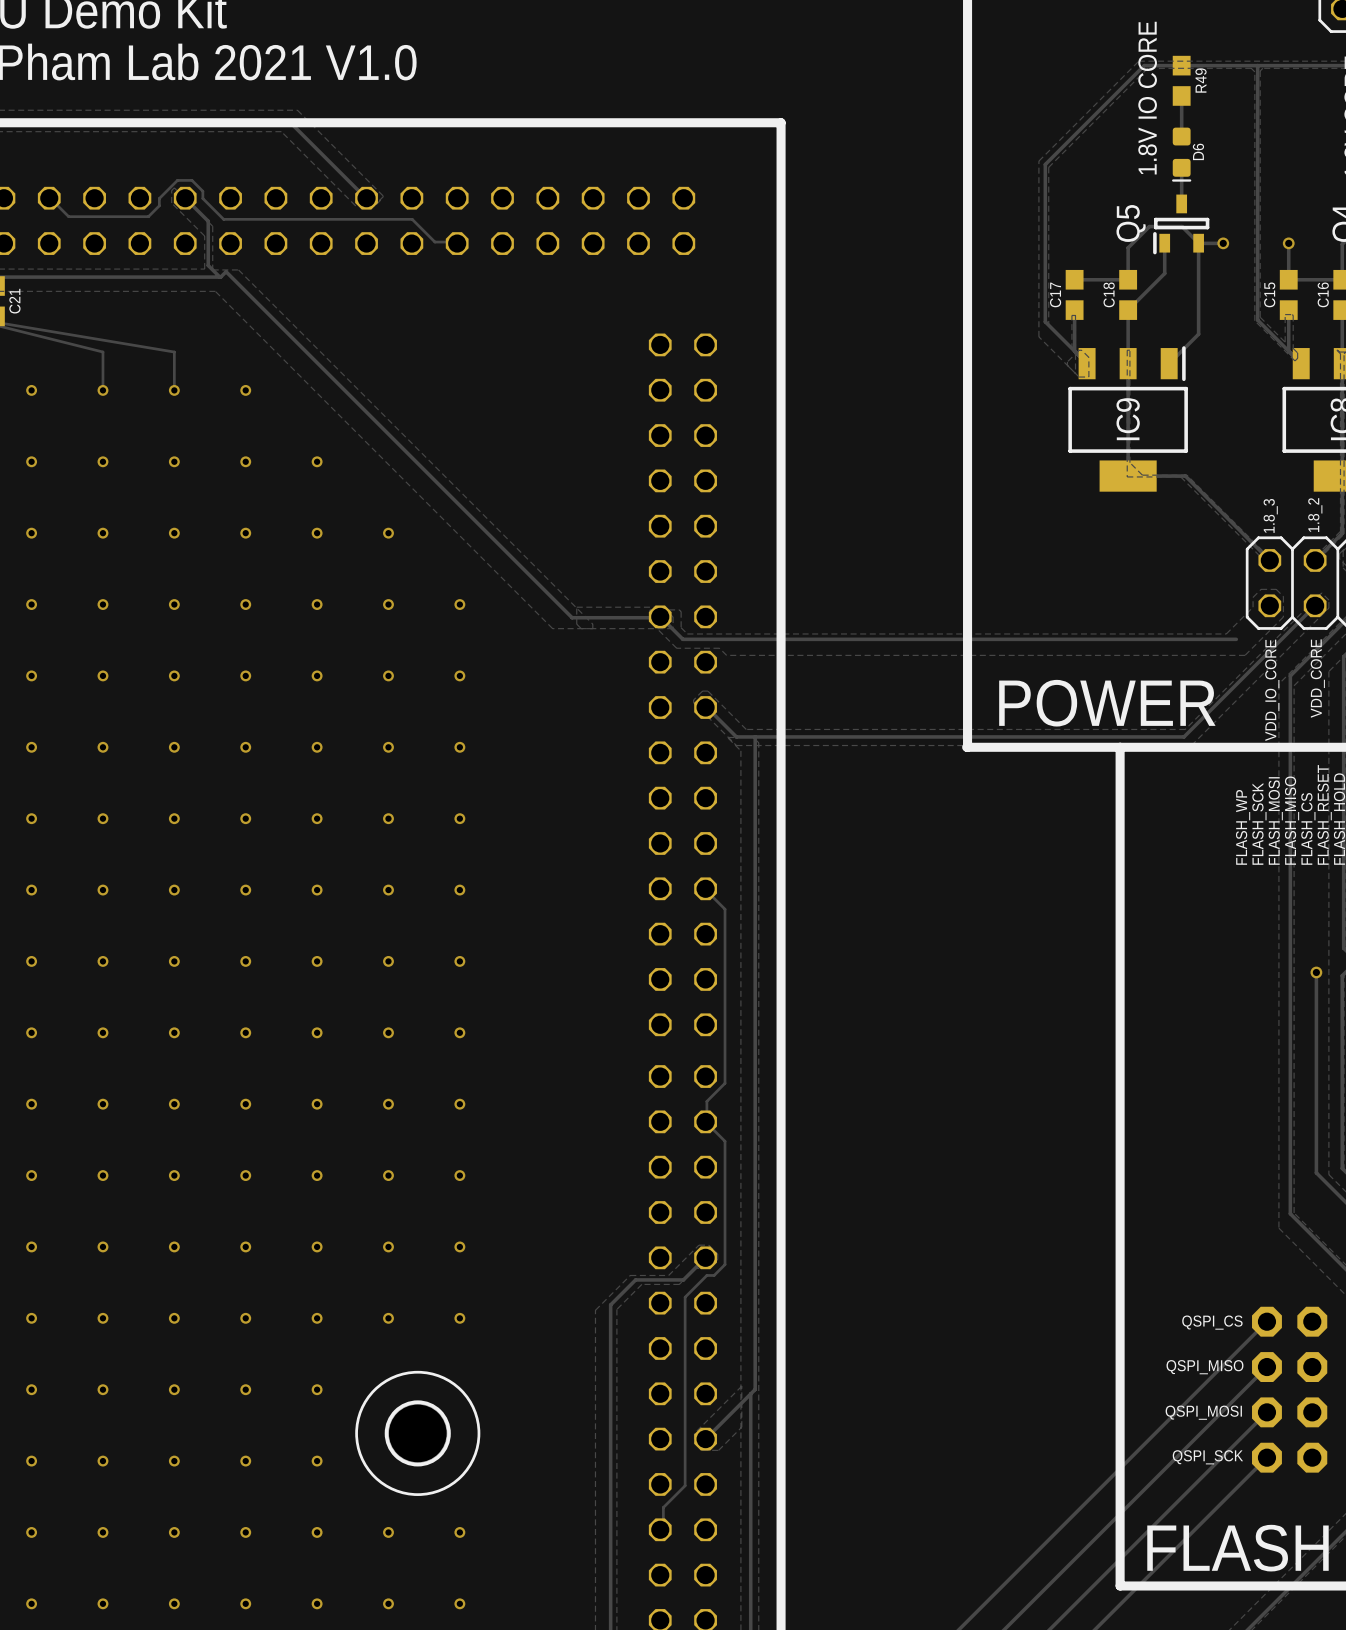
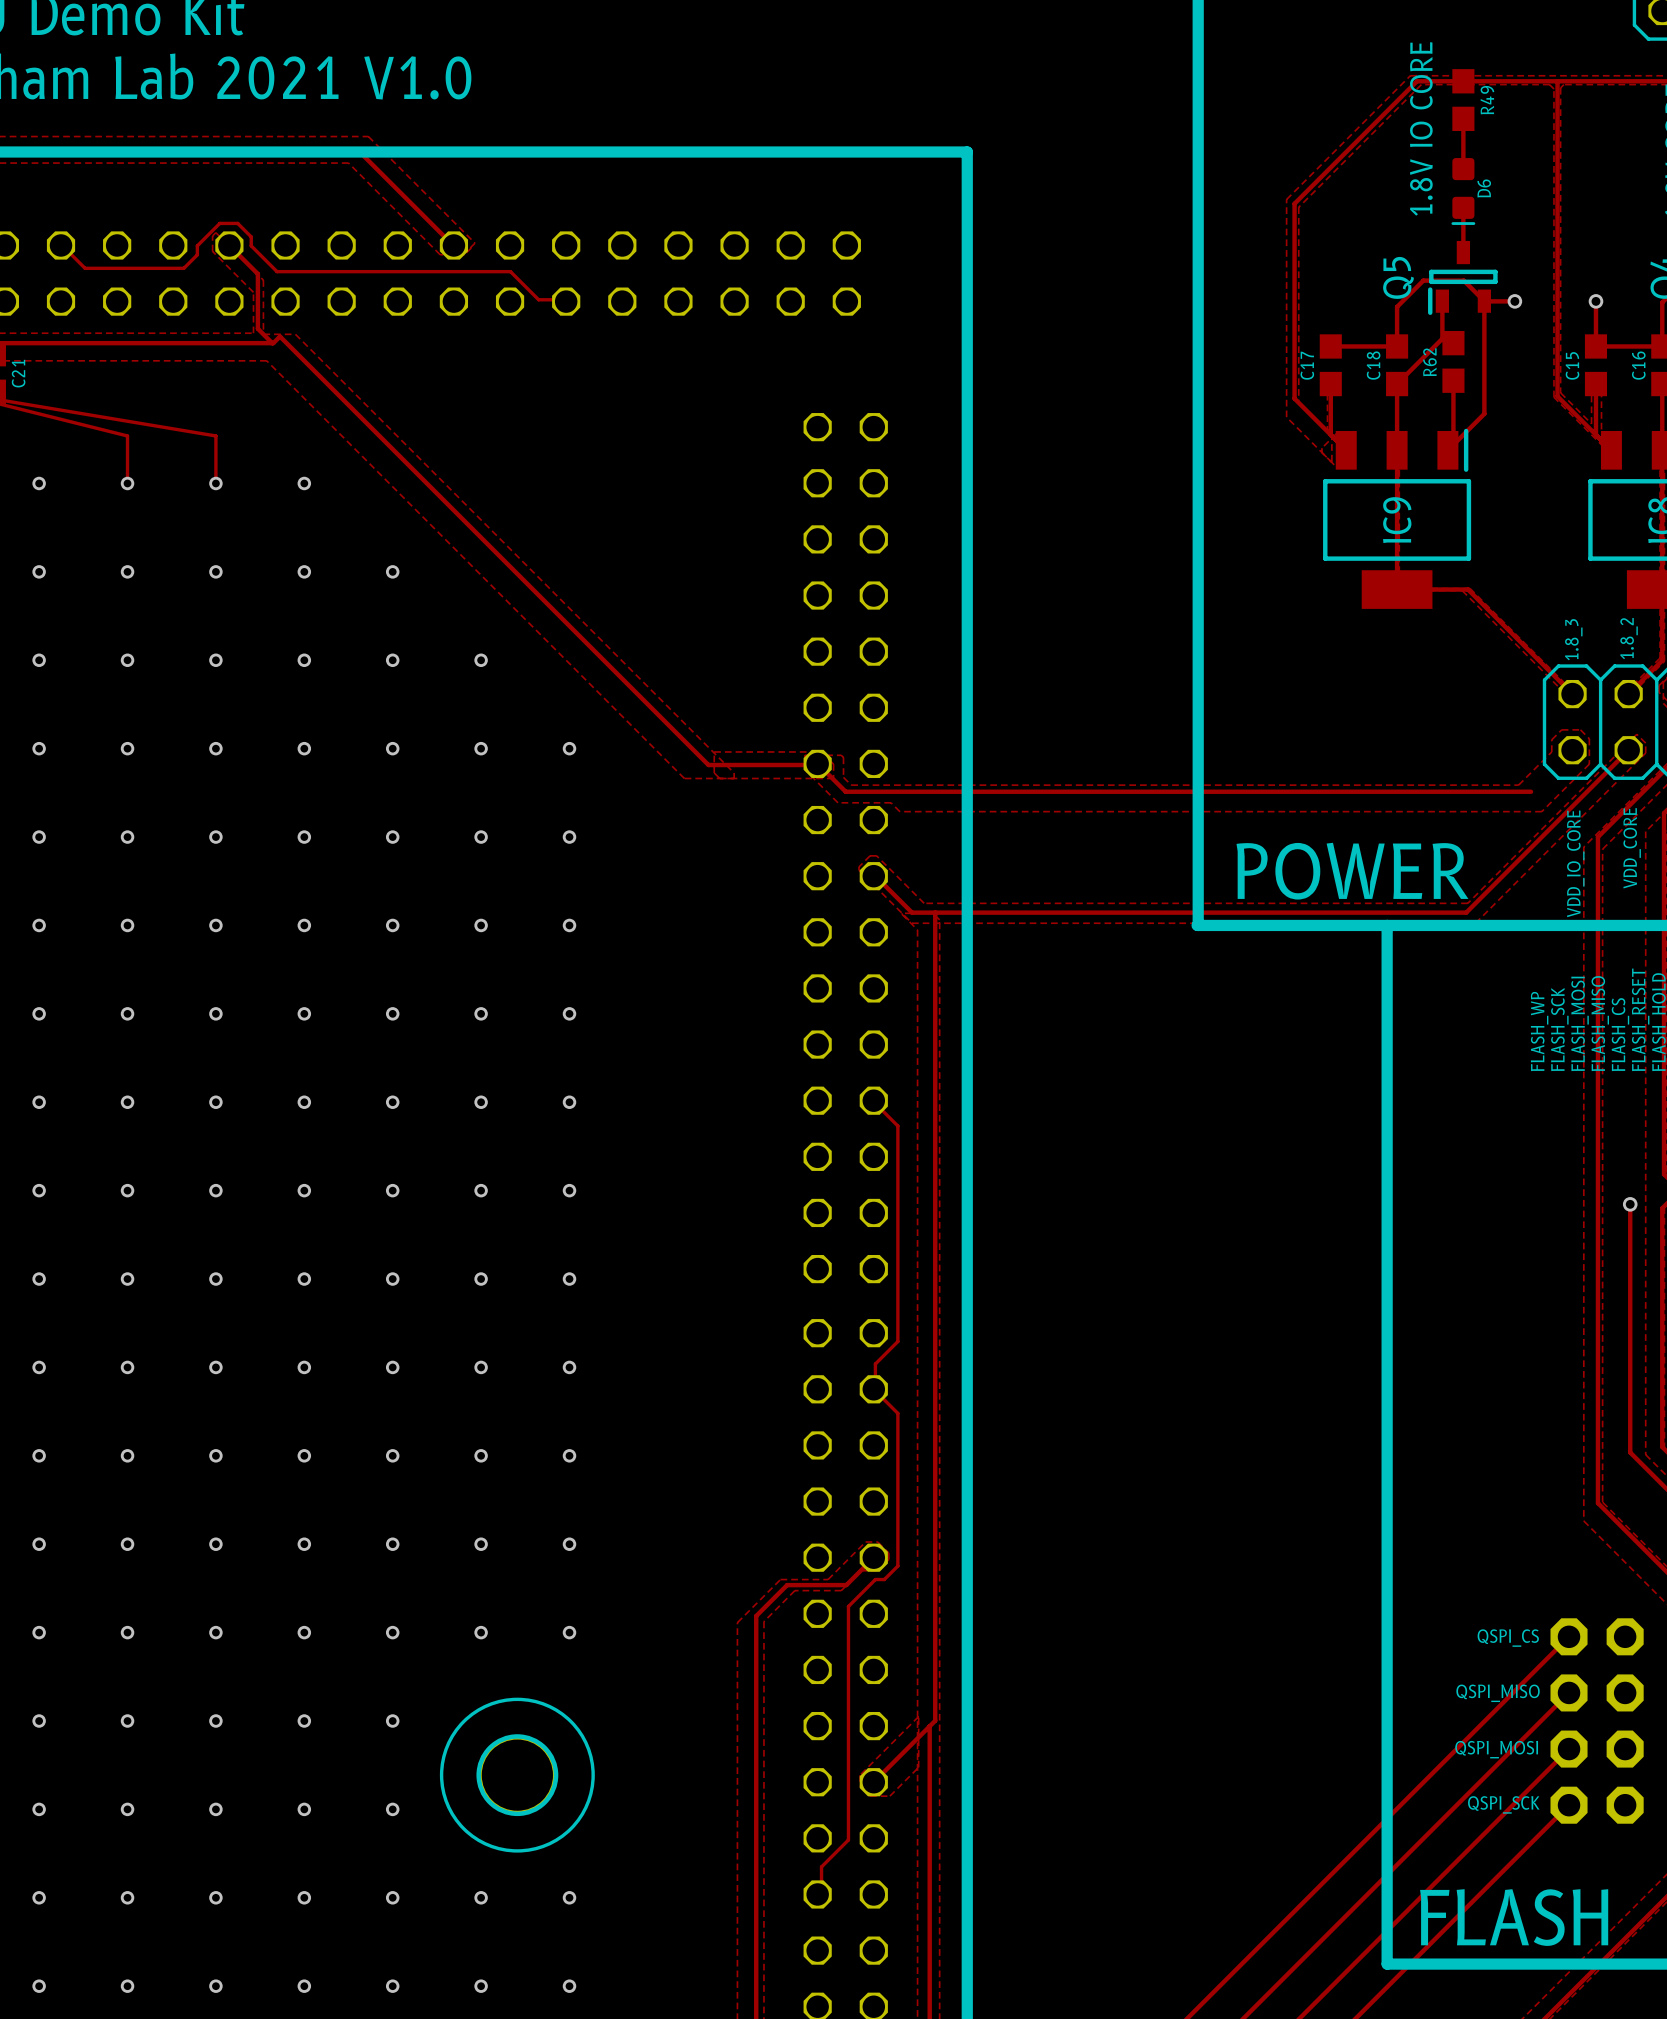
R62: none -> (1453, 361)
track: none -> (1453, 380) (1453, 444)

